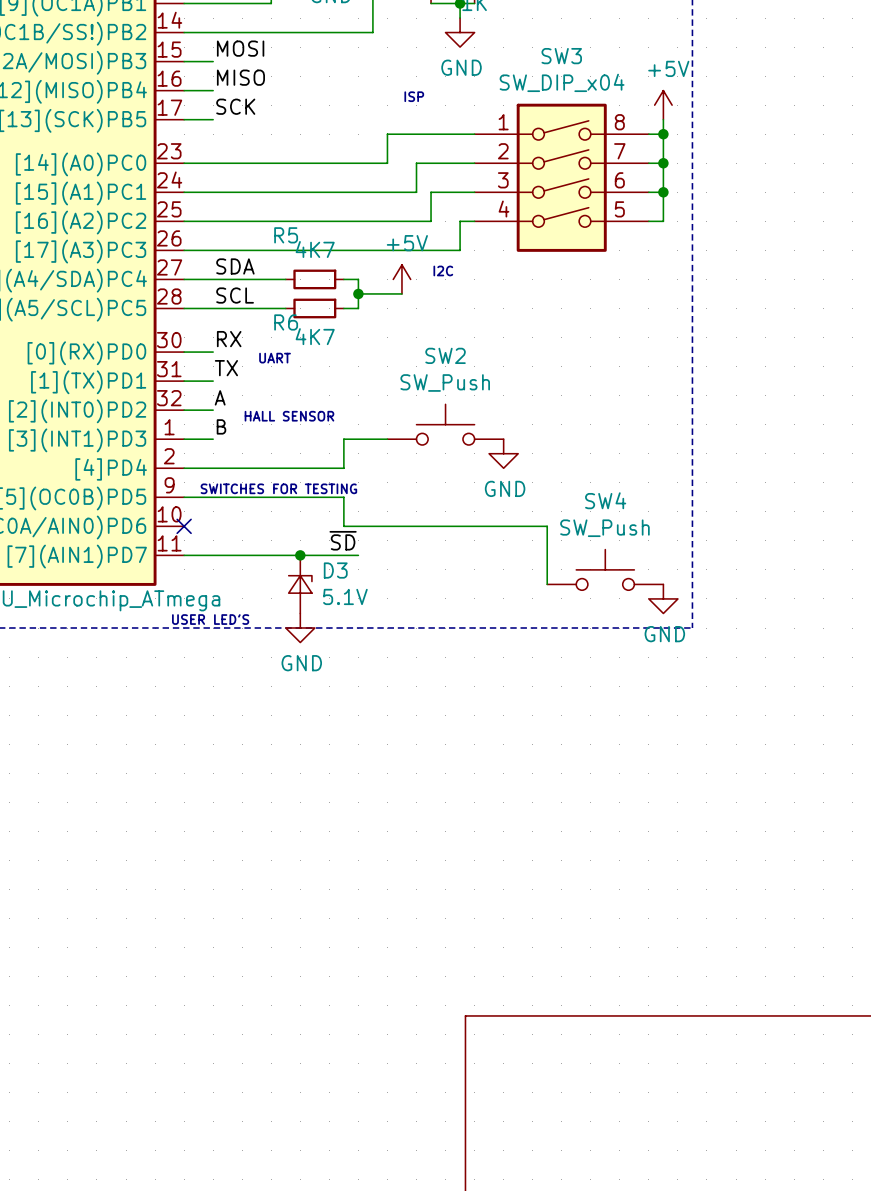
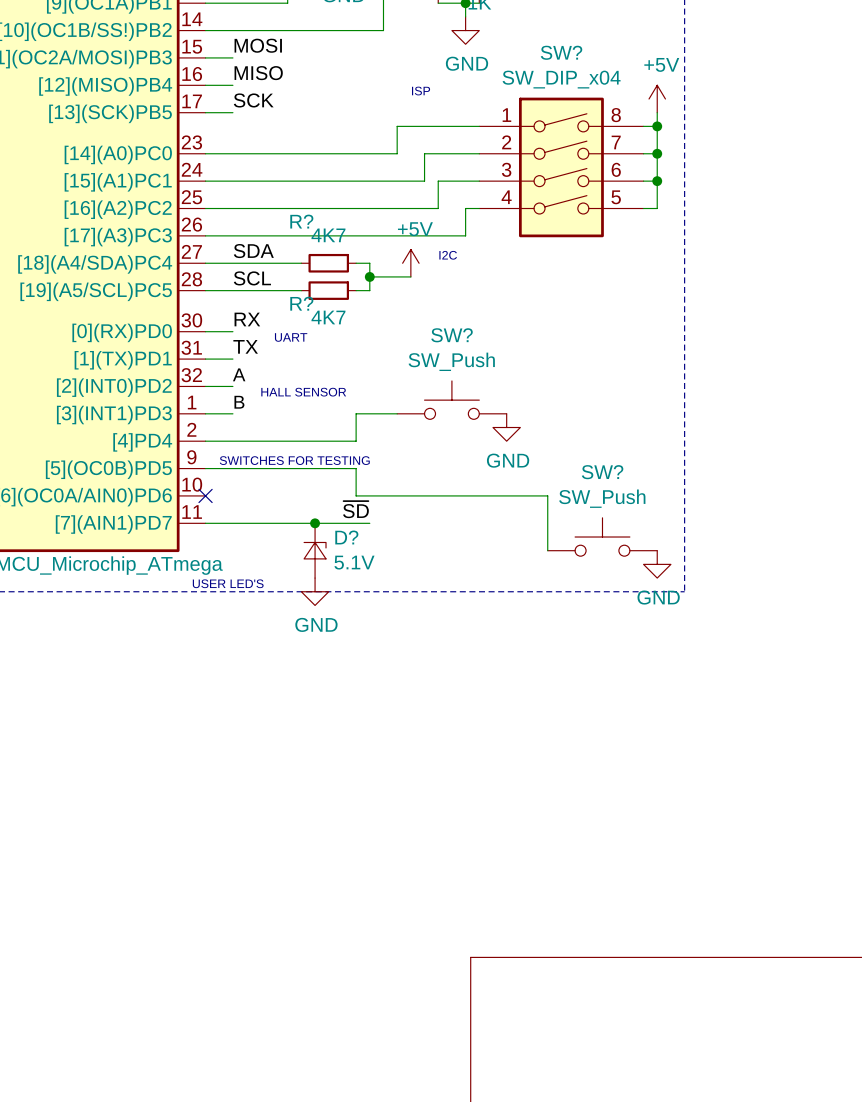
SW3 name: SW3 (561, 56) -> SW? (561, 52)
R5 name: R5 (286, 235) -> R? (301, 221)
R6 name: R6 (286, 322) -> R? (301, 303)
SW2 name: SW2 (445, 355) -> SW? (452, 335)
SW4 name: SW4 (605, 500) -> SW? (602, 472)
D3 name: D3 (335, 570) -> D? (346, 537)

